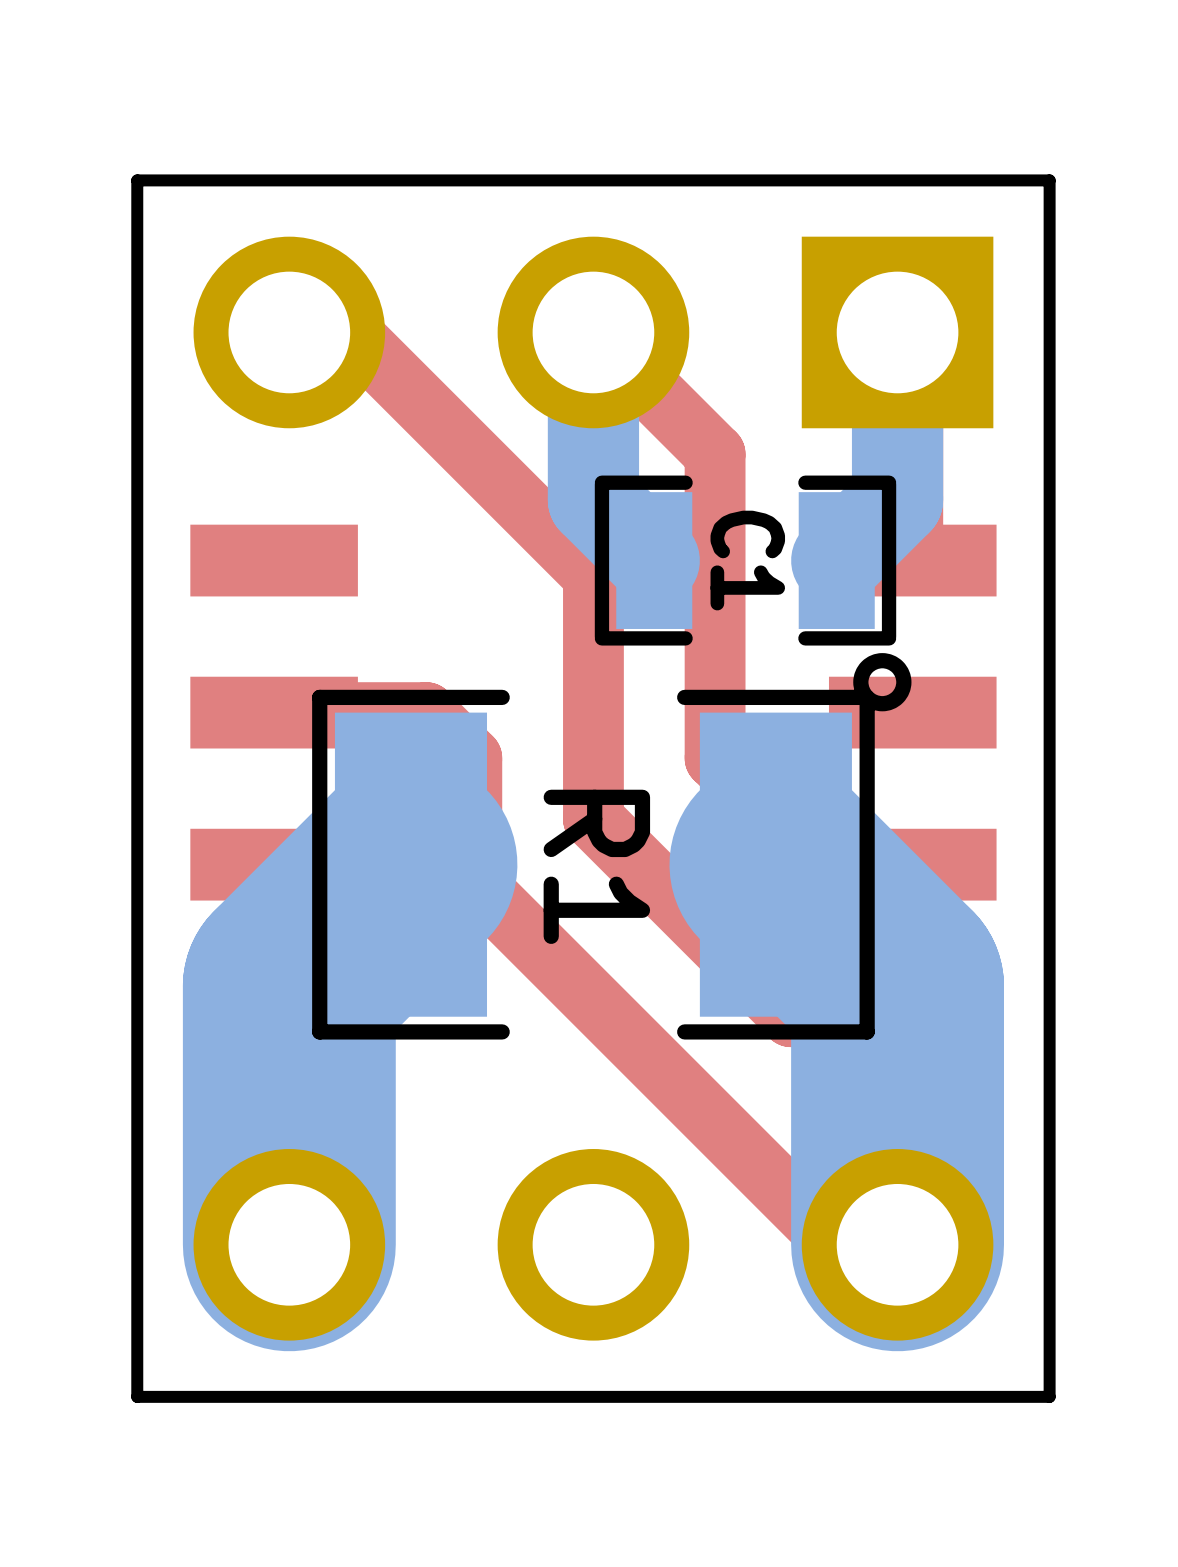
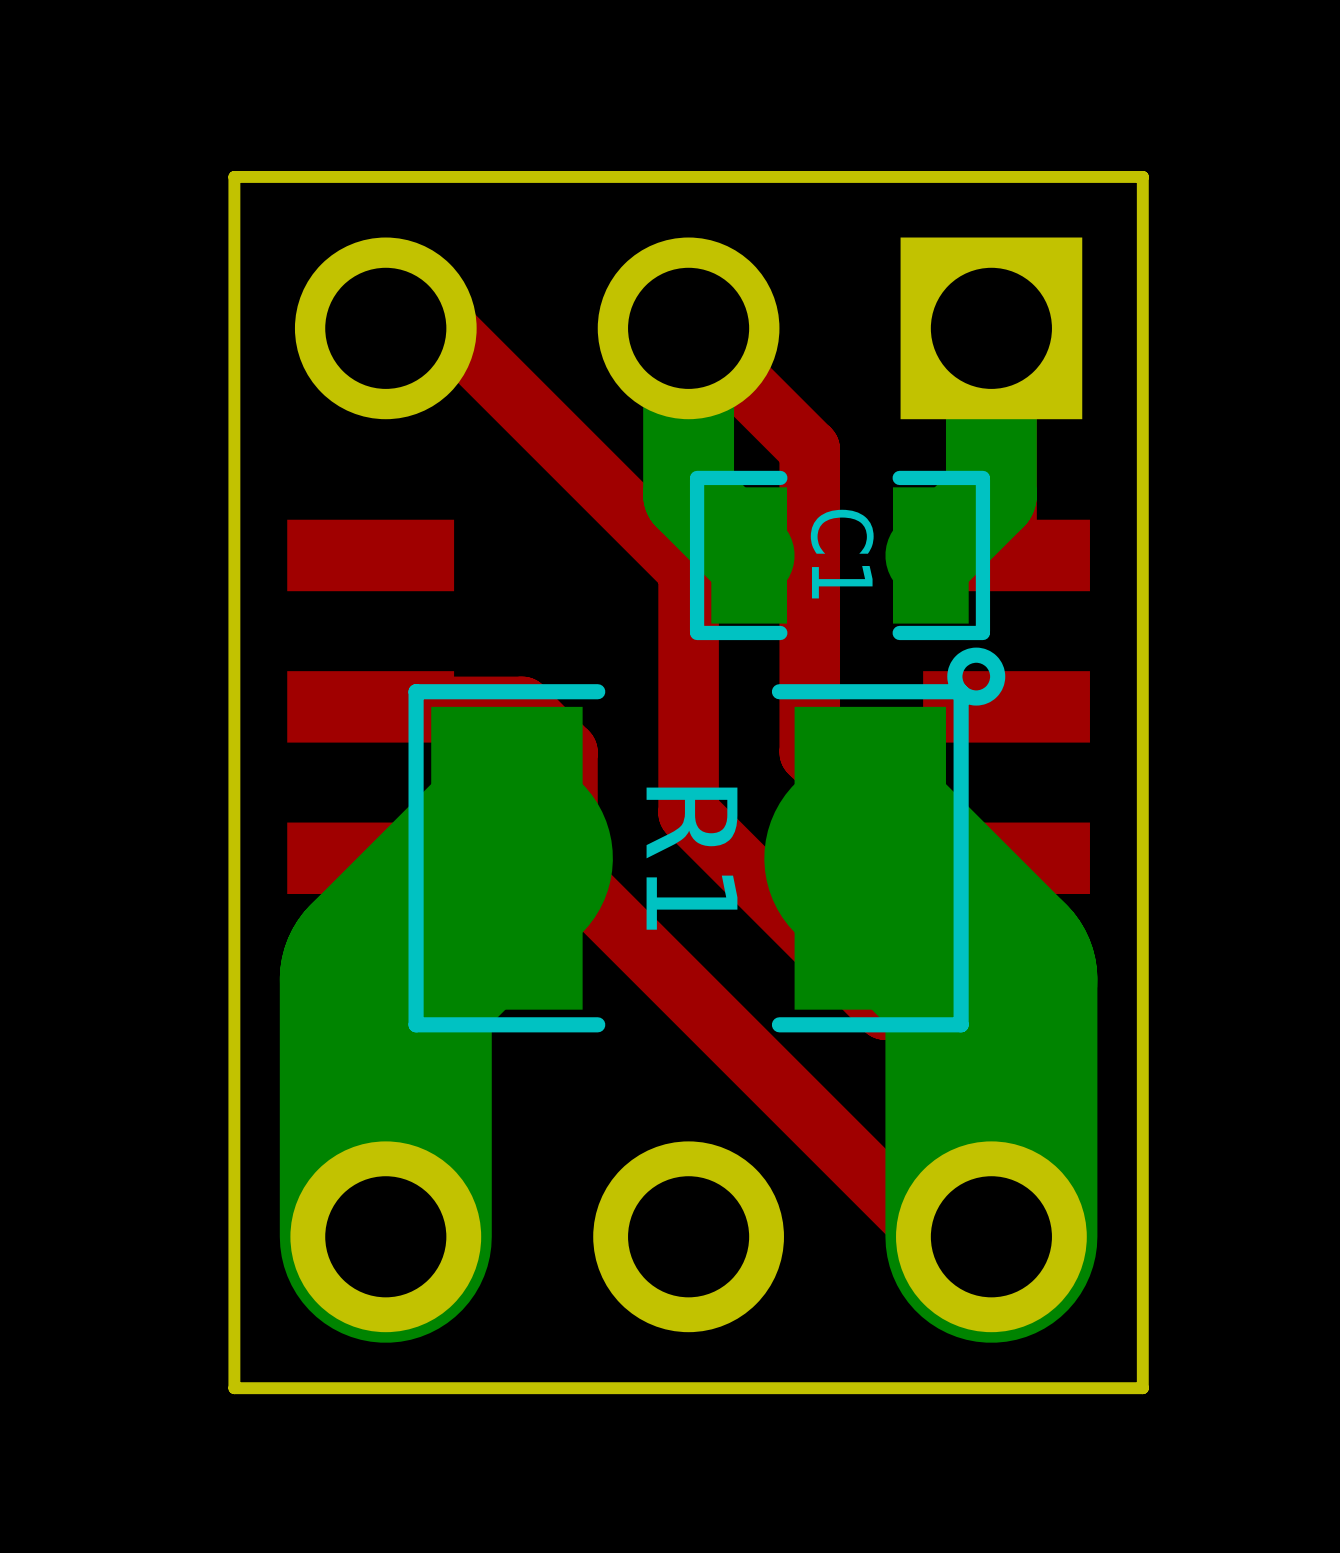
part footprint: [193, 236, 994, 429] -> [294, 237, 1083, 420]

